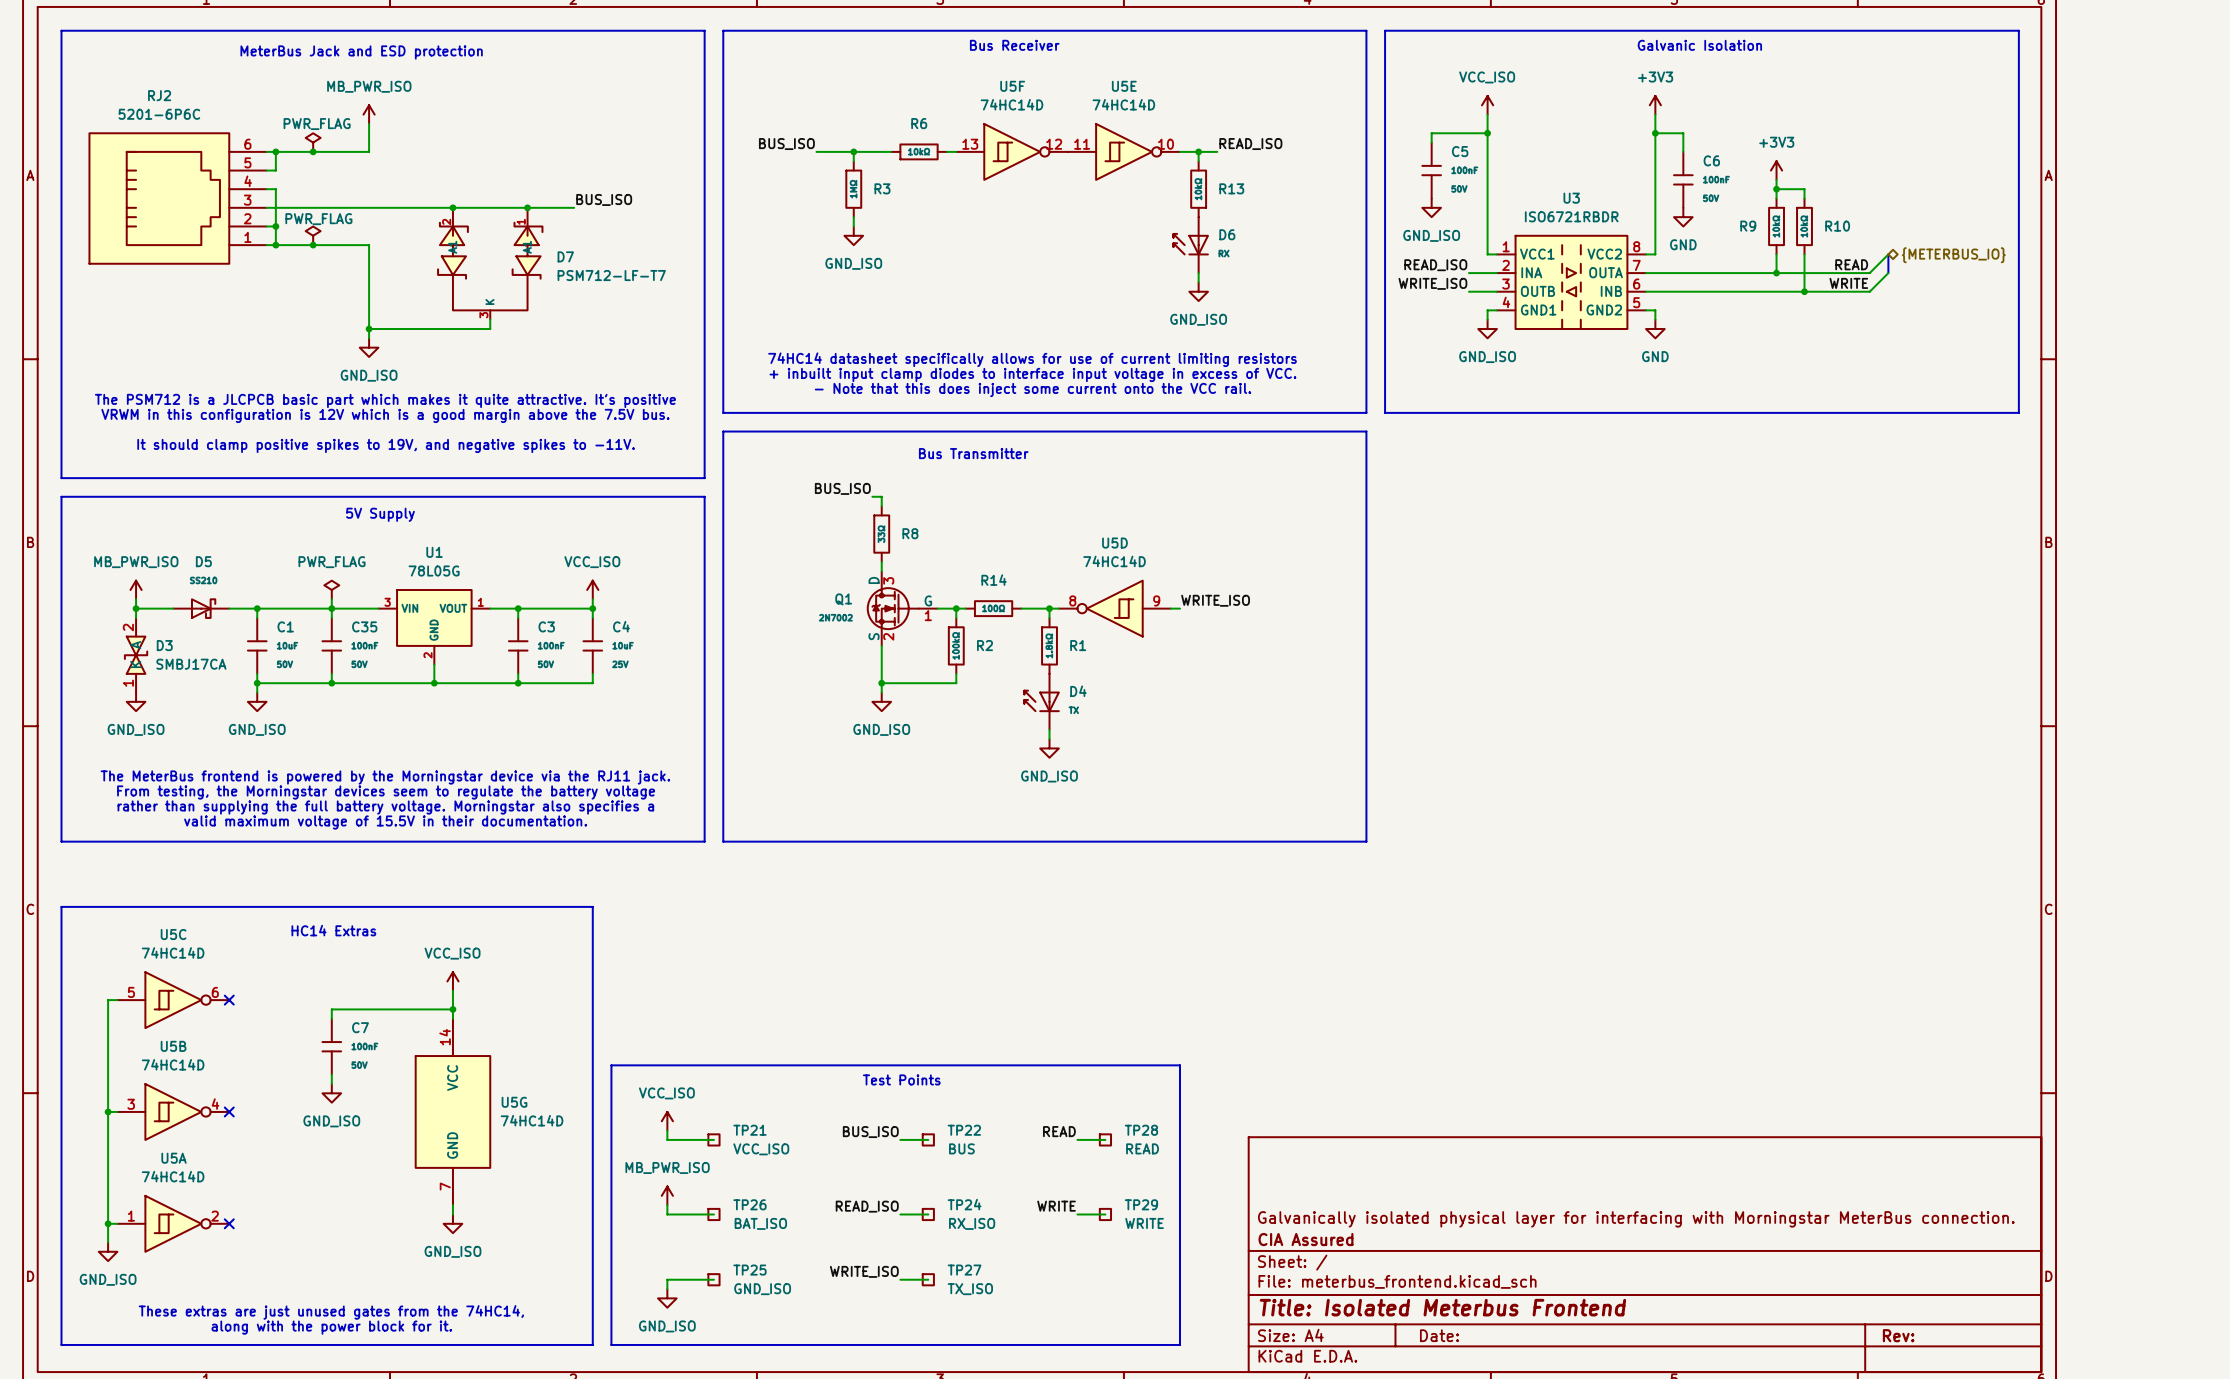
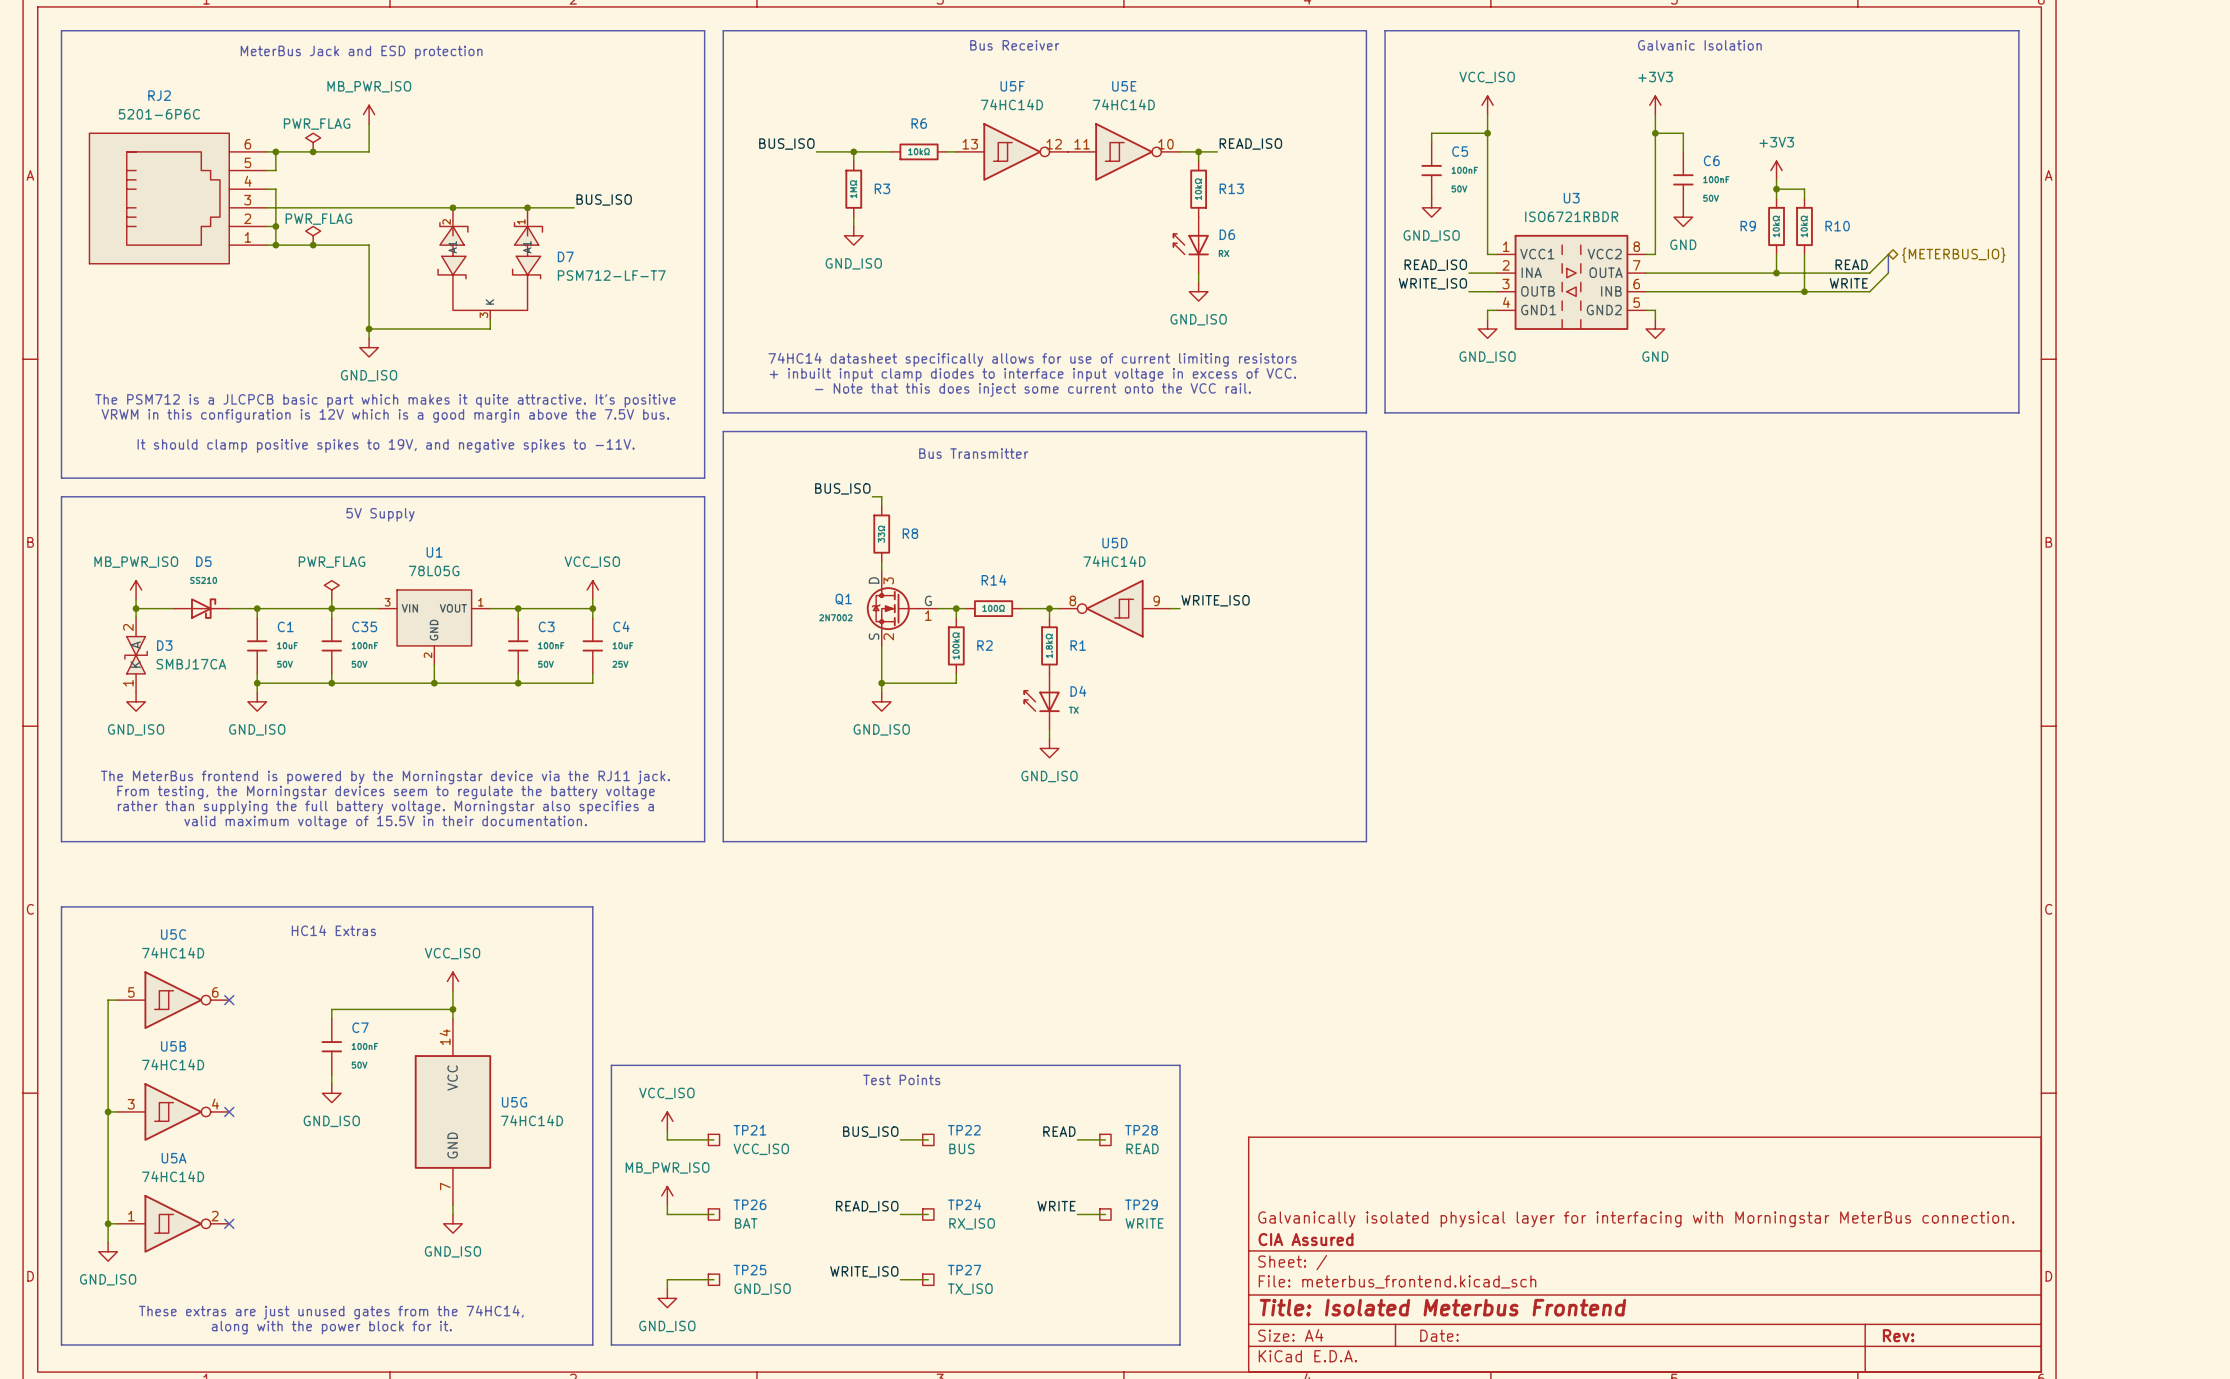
TP26 value: BAT_ISO (760, 1223) -> BAT (746, 1223)

